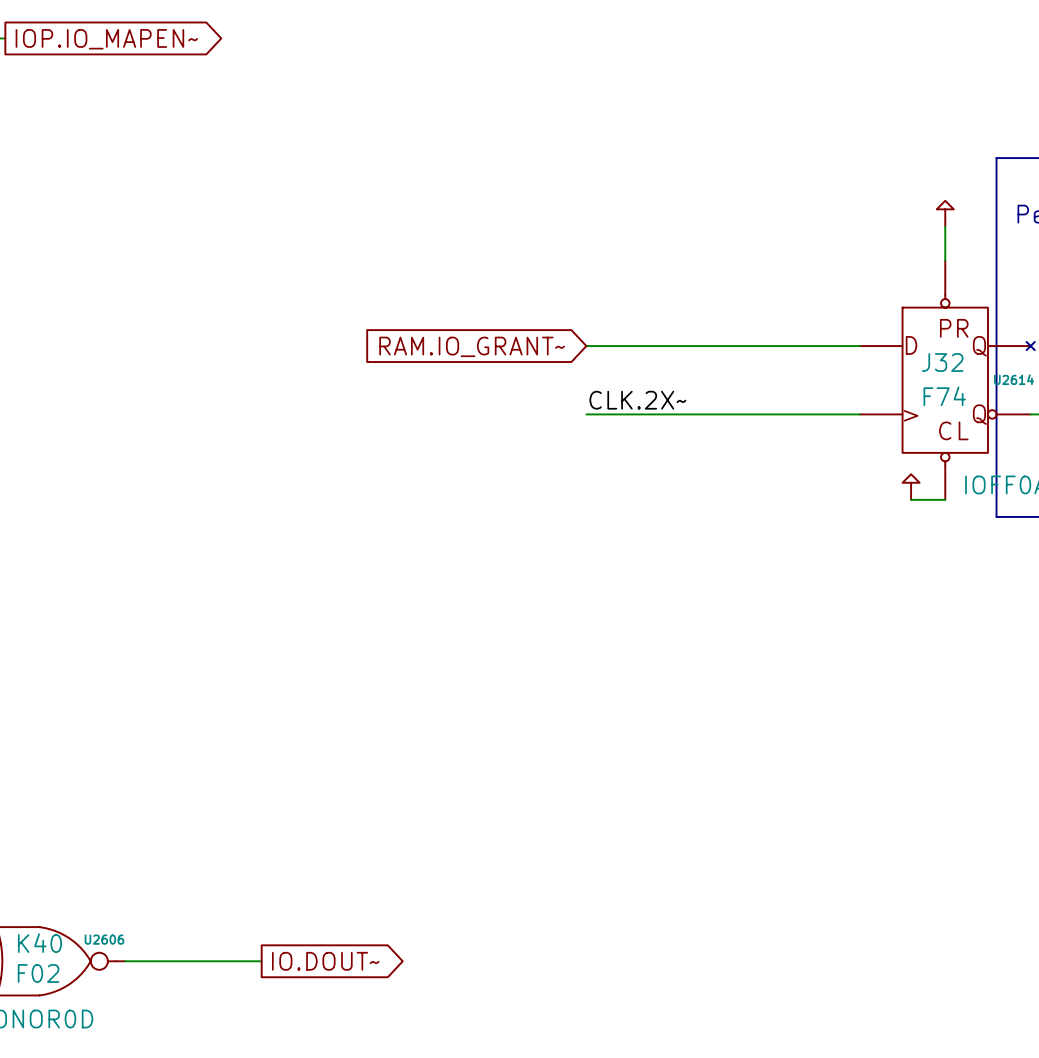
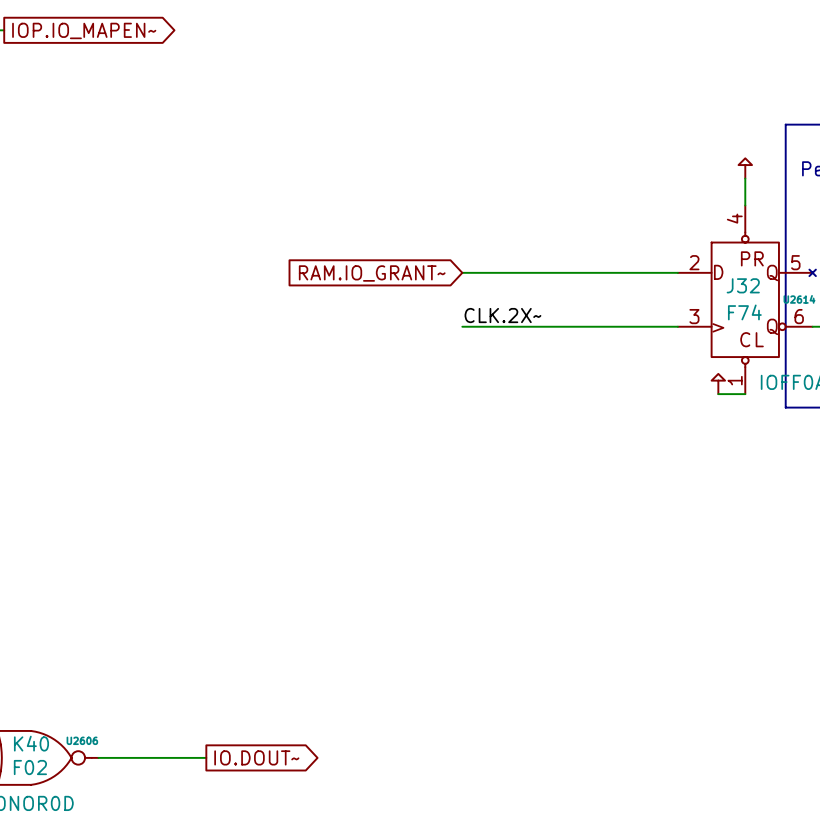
U2614 pin number: none -> 4 (734, 218)
U2614 pin number: none -> 2 (694, 262)
U2614 pin number: none -> 5 (795, 262)
U2614 pin number: none -> 3 (694, 316)
U2614 pin number: none -> 6 (799, 316)
U2614 pin number: none -> 1 (735, 380)

